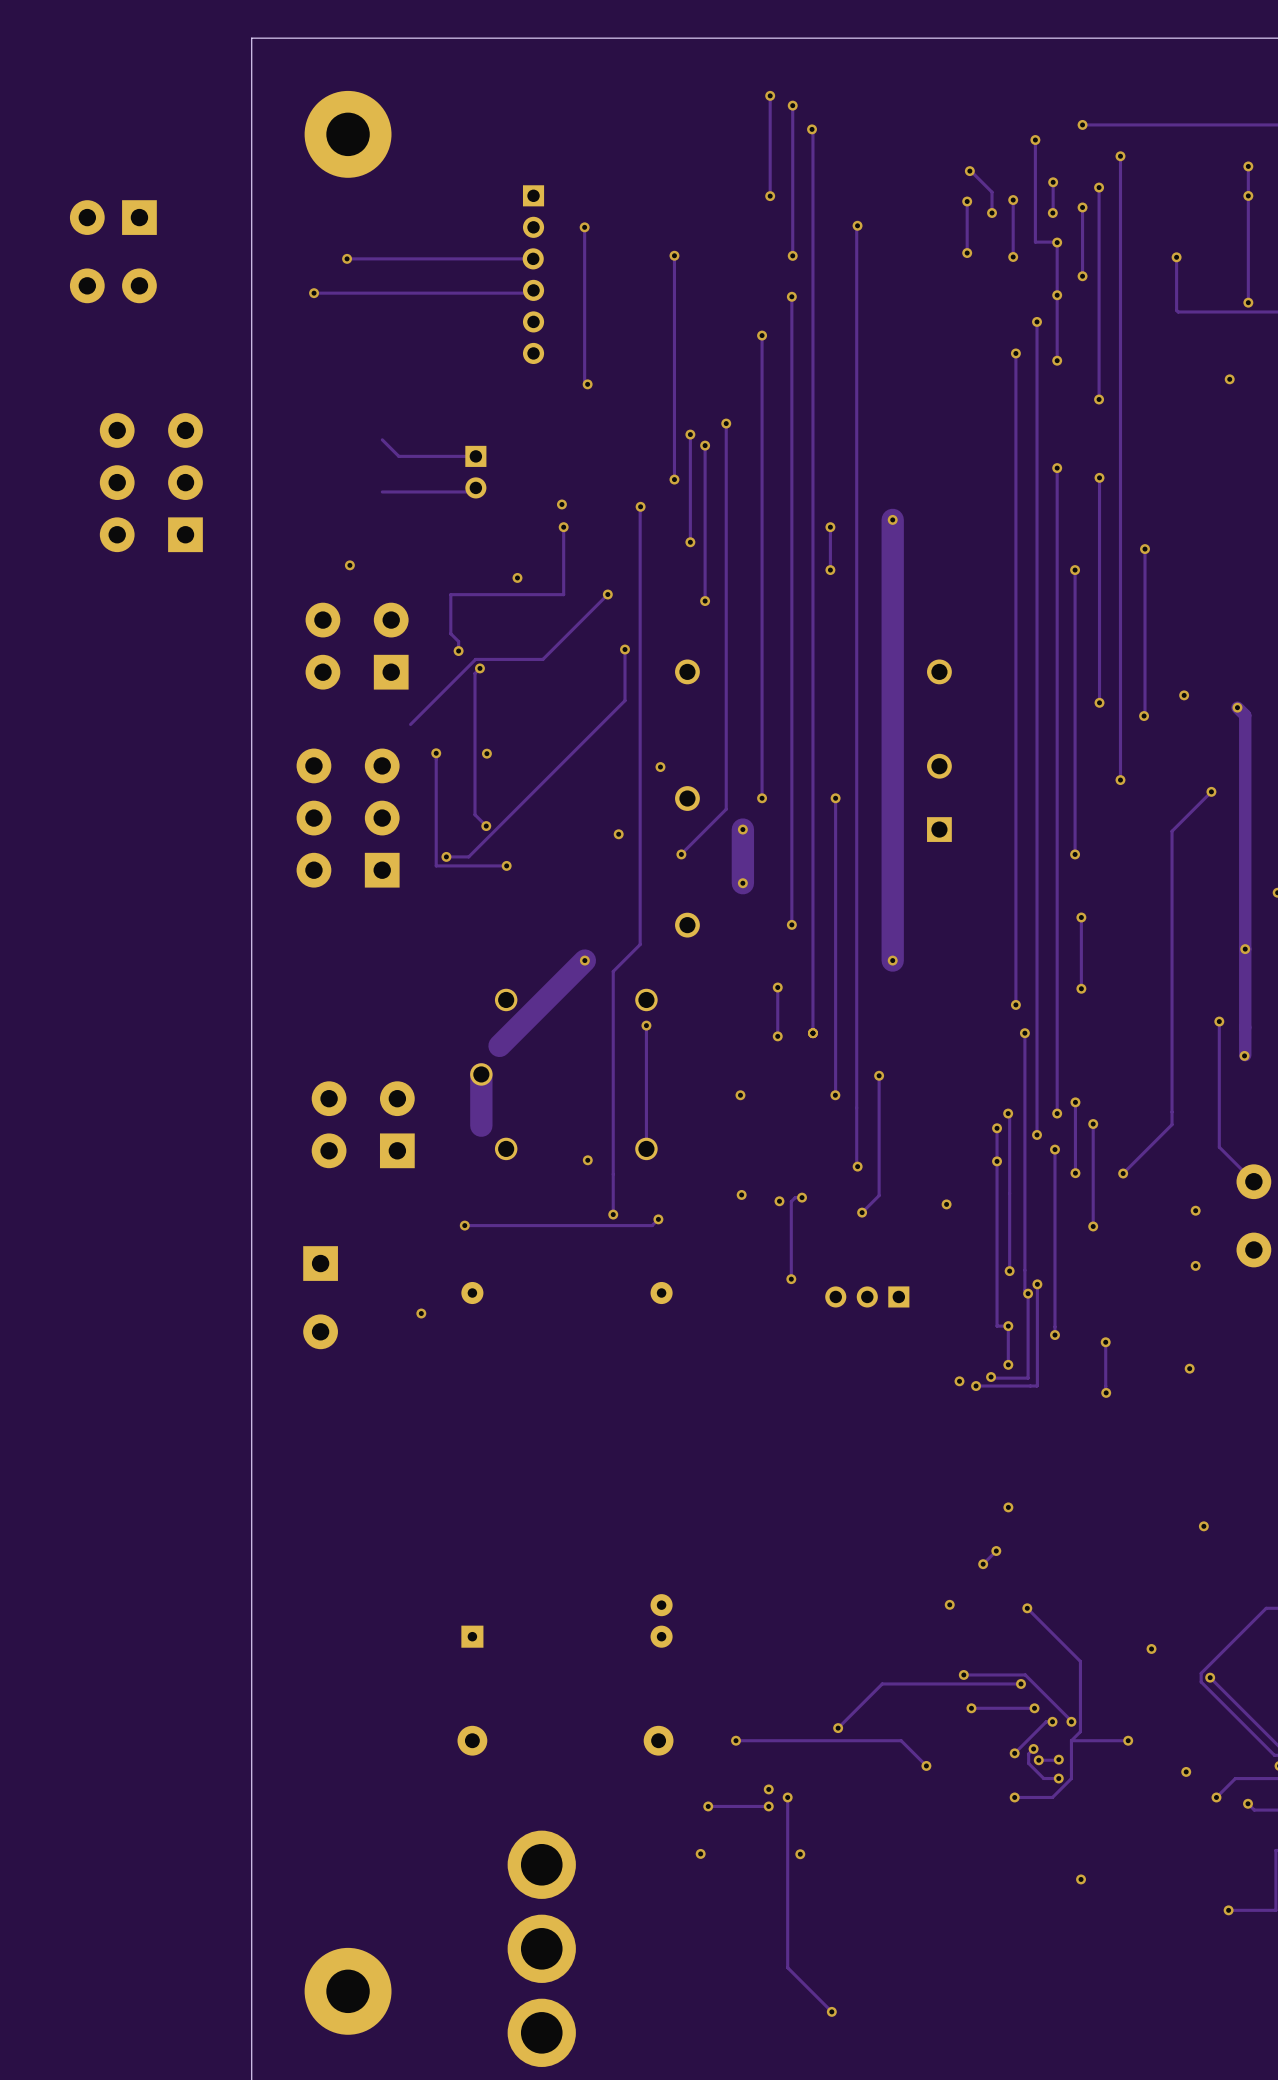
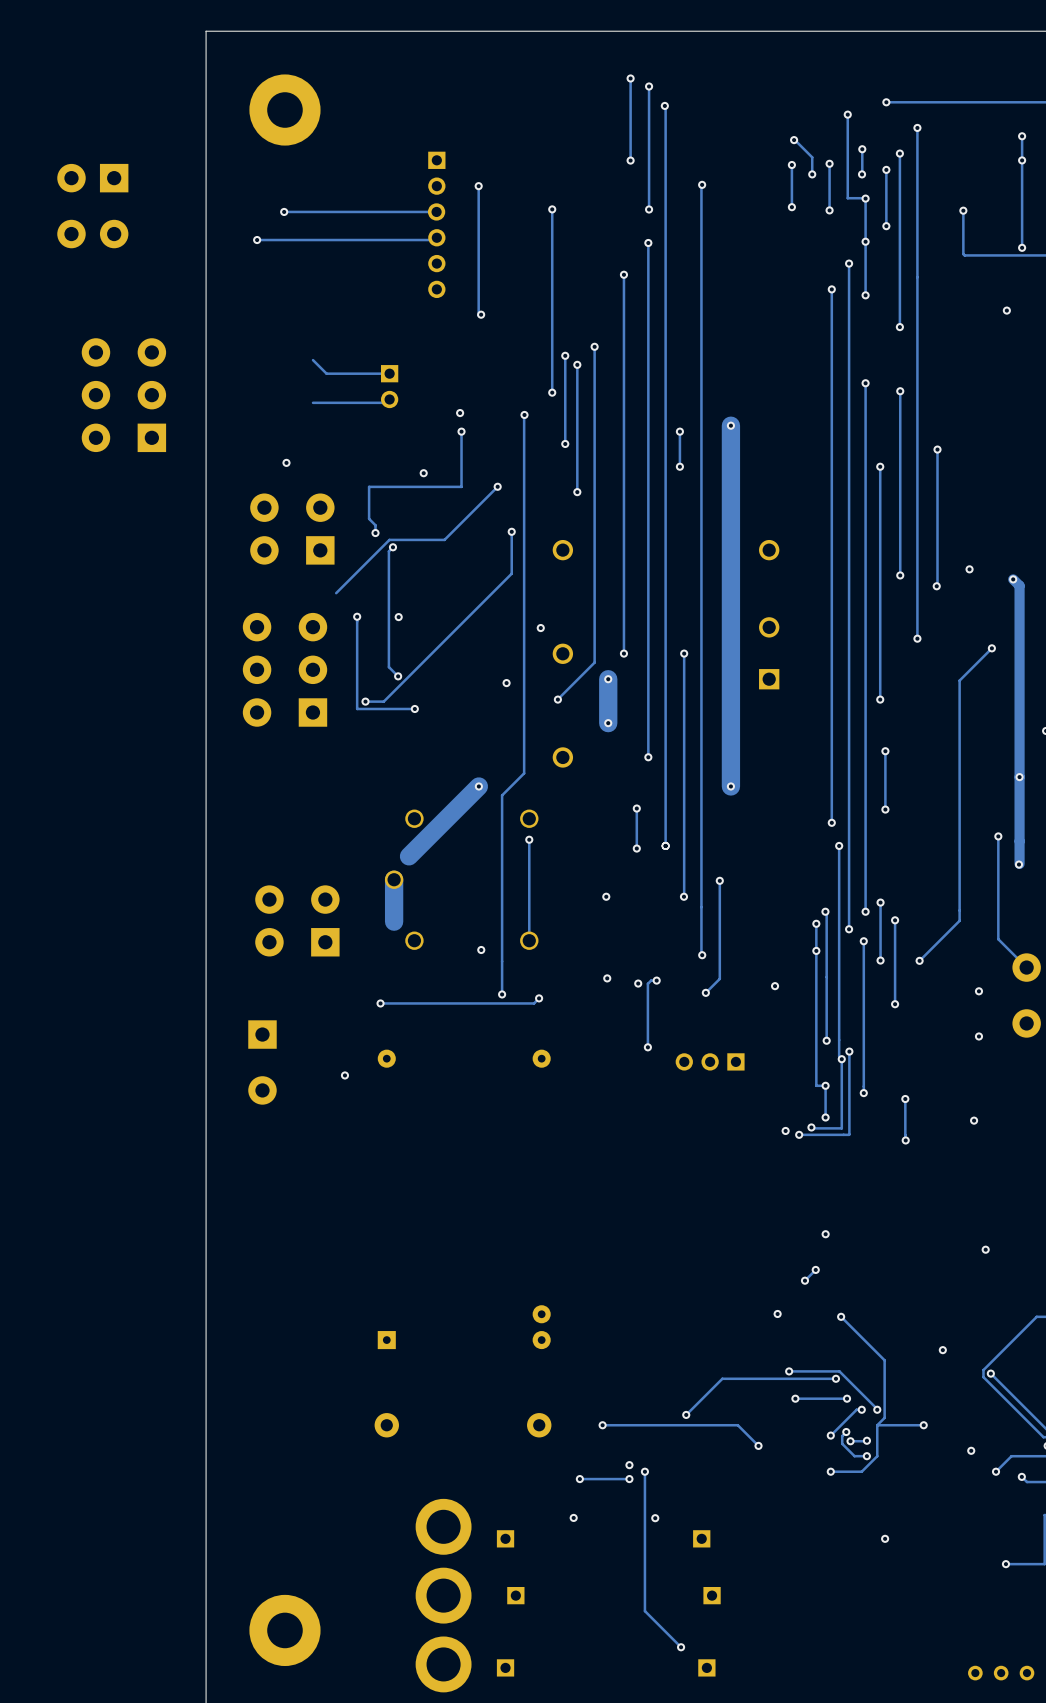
part: none -> (505, 1538)
part: none -> (701, 1538)
part: none -> (515, 1595)
part: none -> (712, 1595)
part: none -> (505, 1667)
part: none -> (706, 1667)
part: none -> (1001, 1673)

